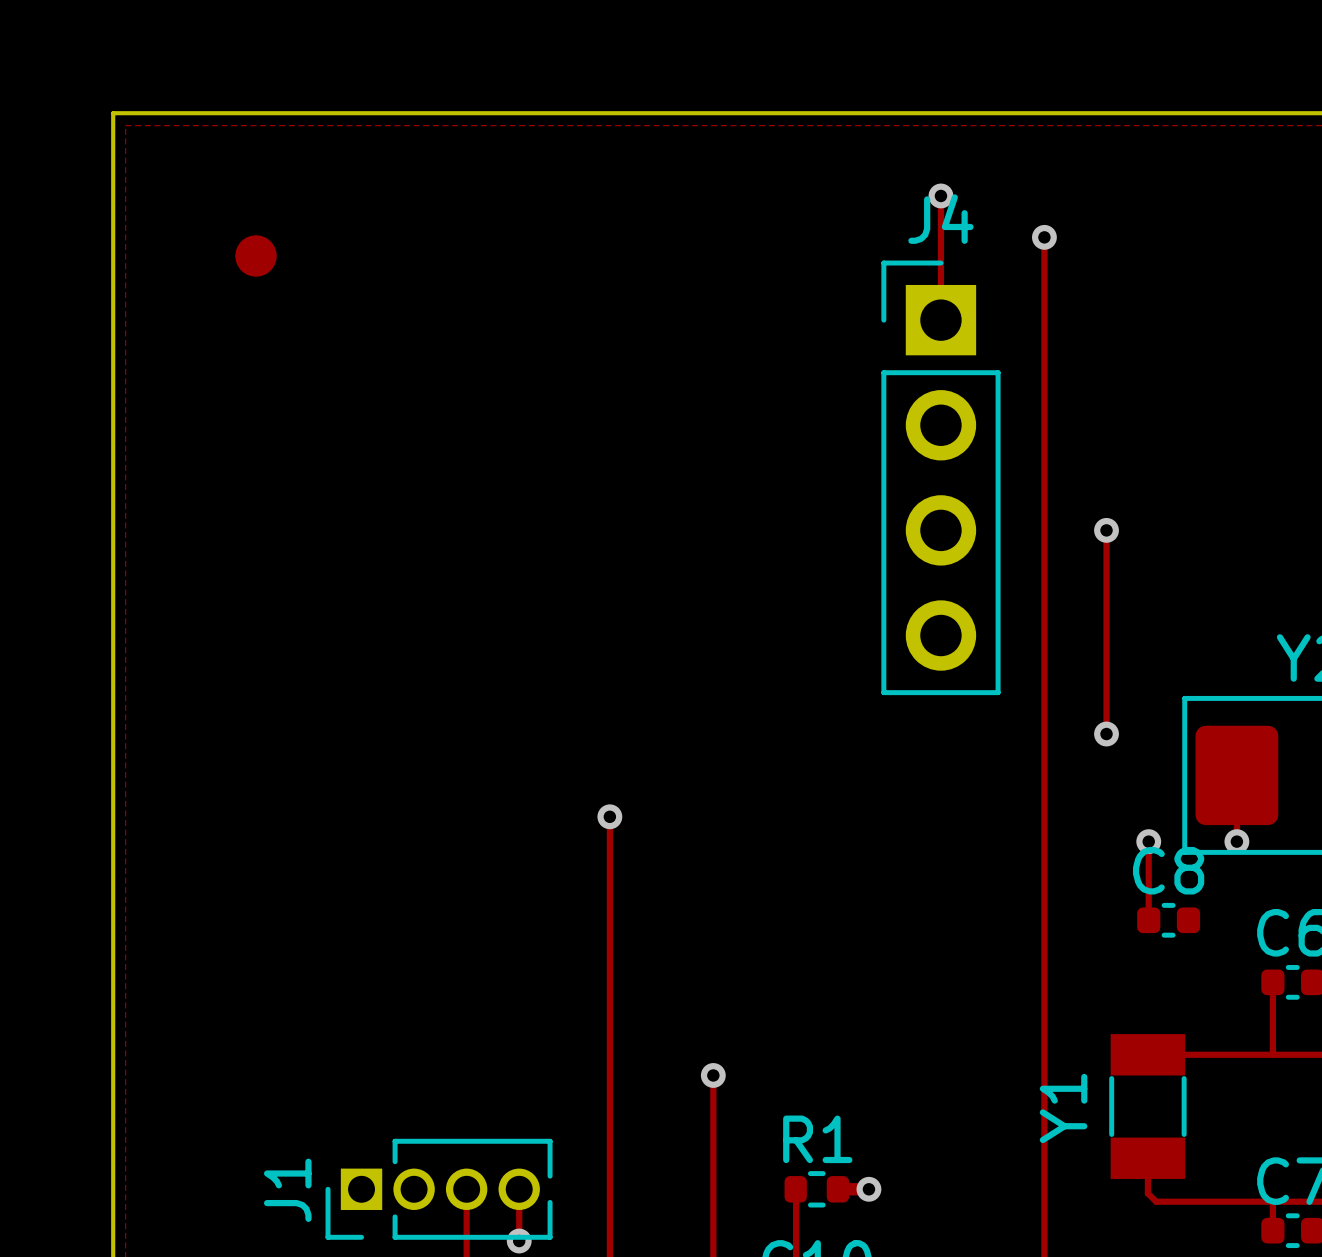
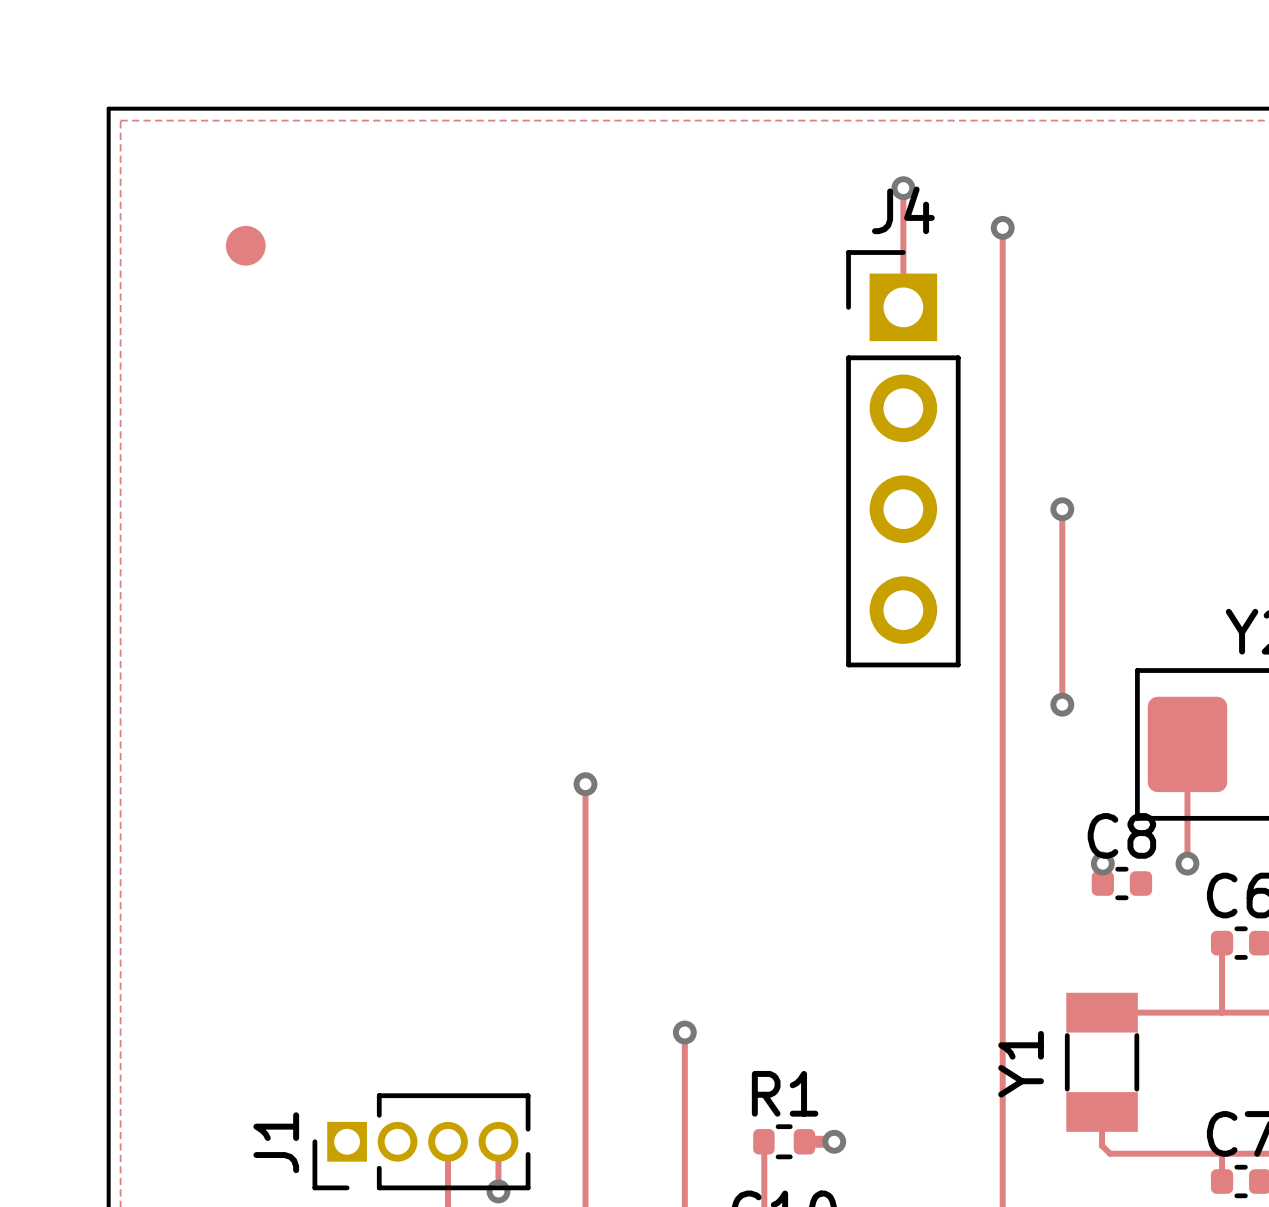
track: (1148, 841) (1148, 899) -> (1187, 808) (1187, 863)
via: (1148, 841) -> none
via: (1236, 841) -> none
via: none -> (1102, 863)
via: none -> (1187, 863)

